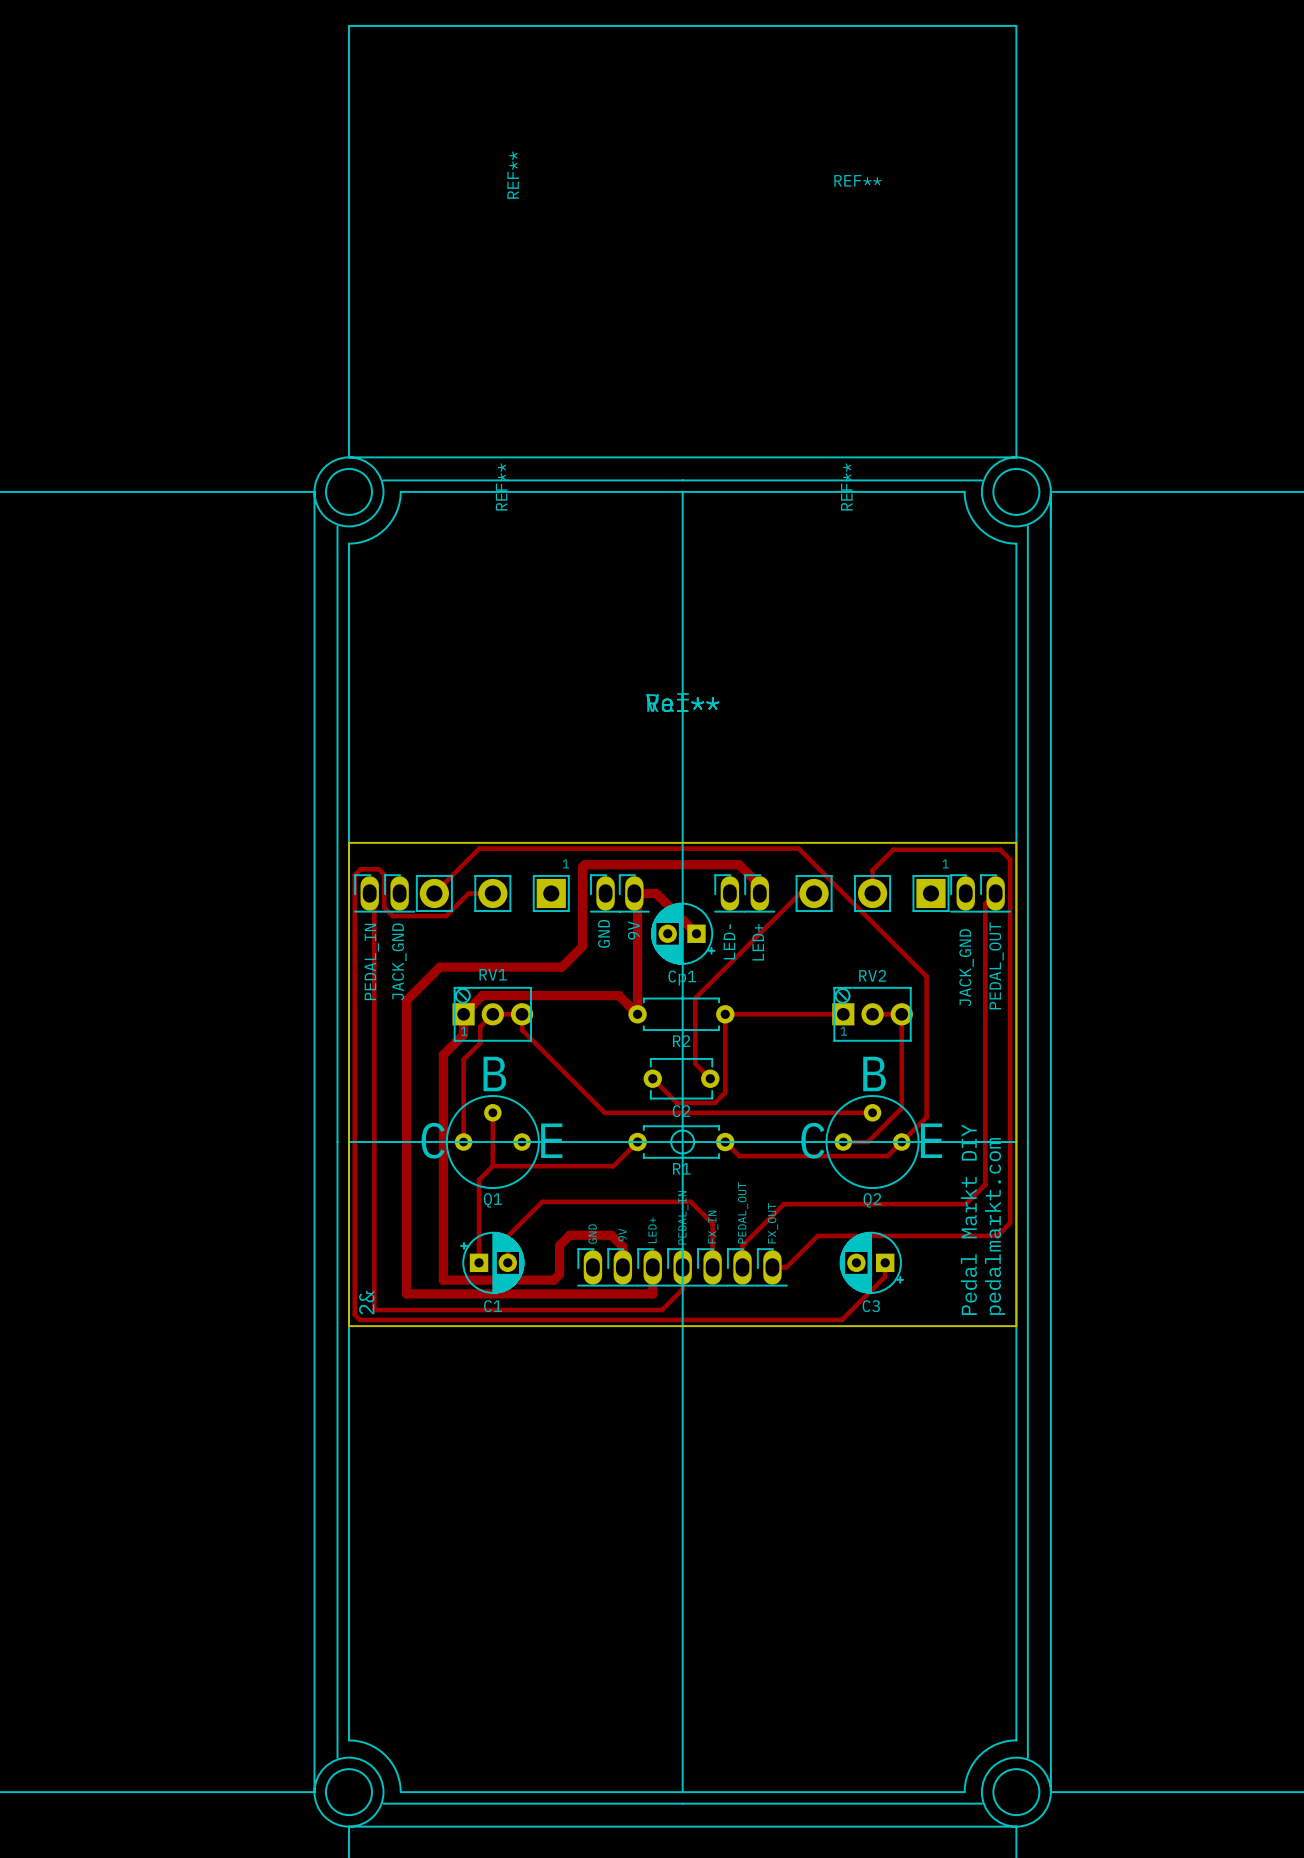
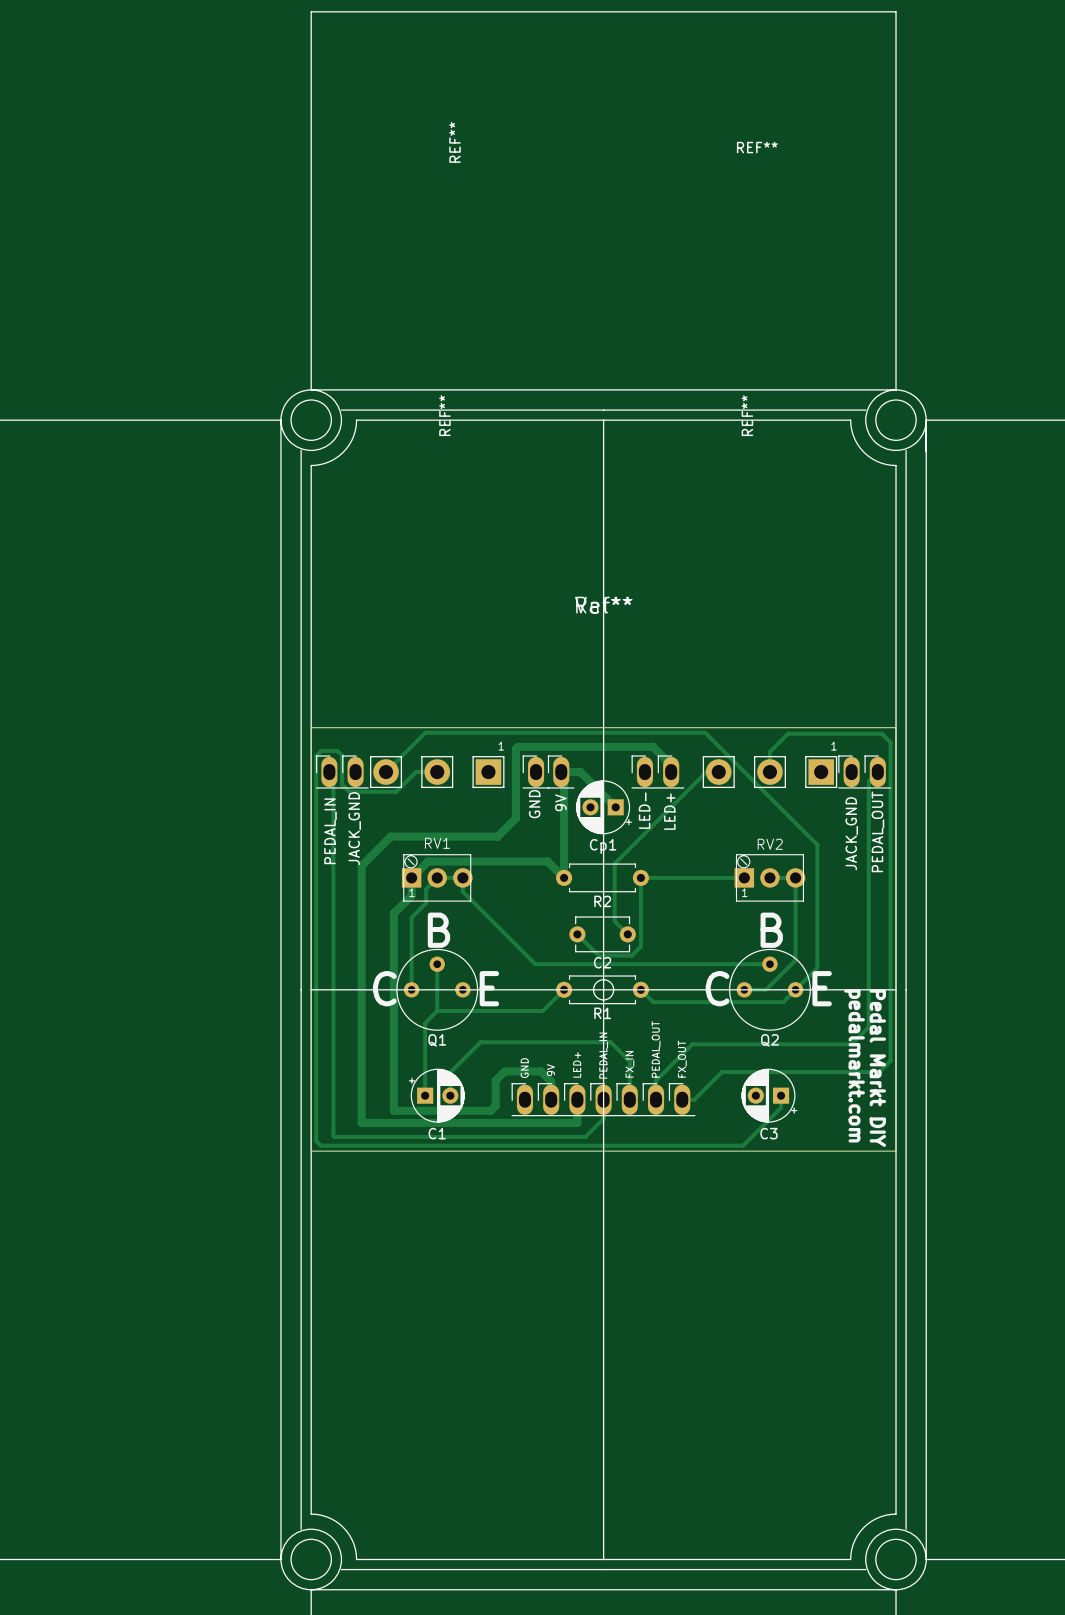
text rotation: 0° (968, 1219) -> 180° (877, 1068)
text rotation: 0° (995, 1226) -> 180° (854, 1065)
text: 2& (366, 1302) -> none

